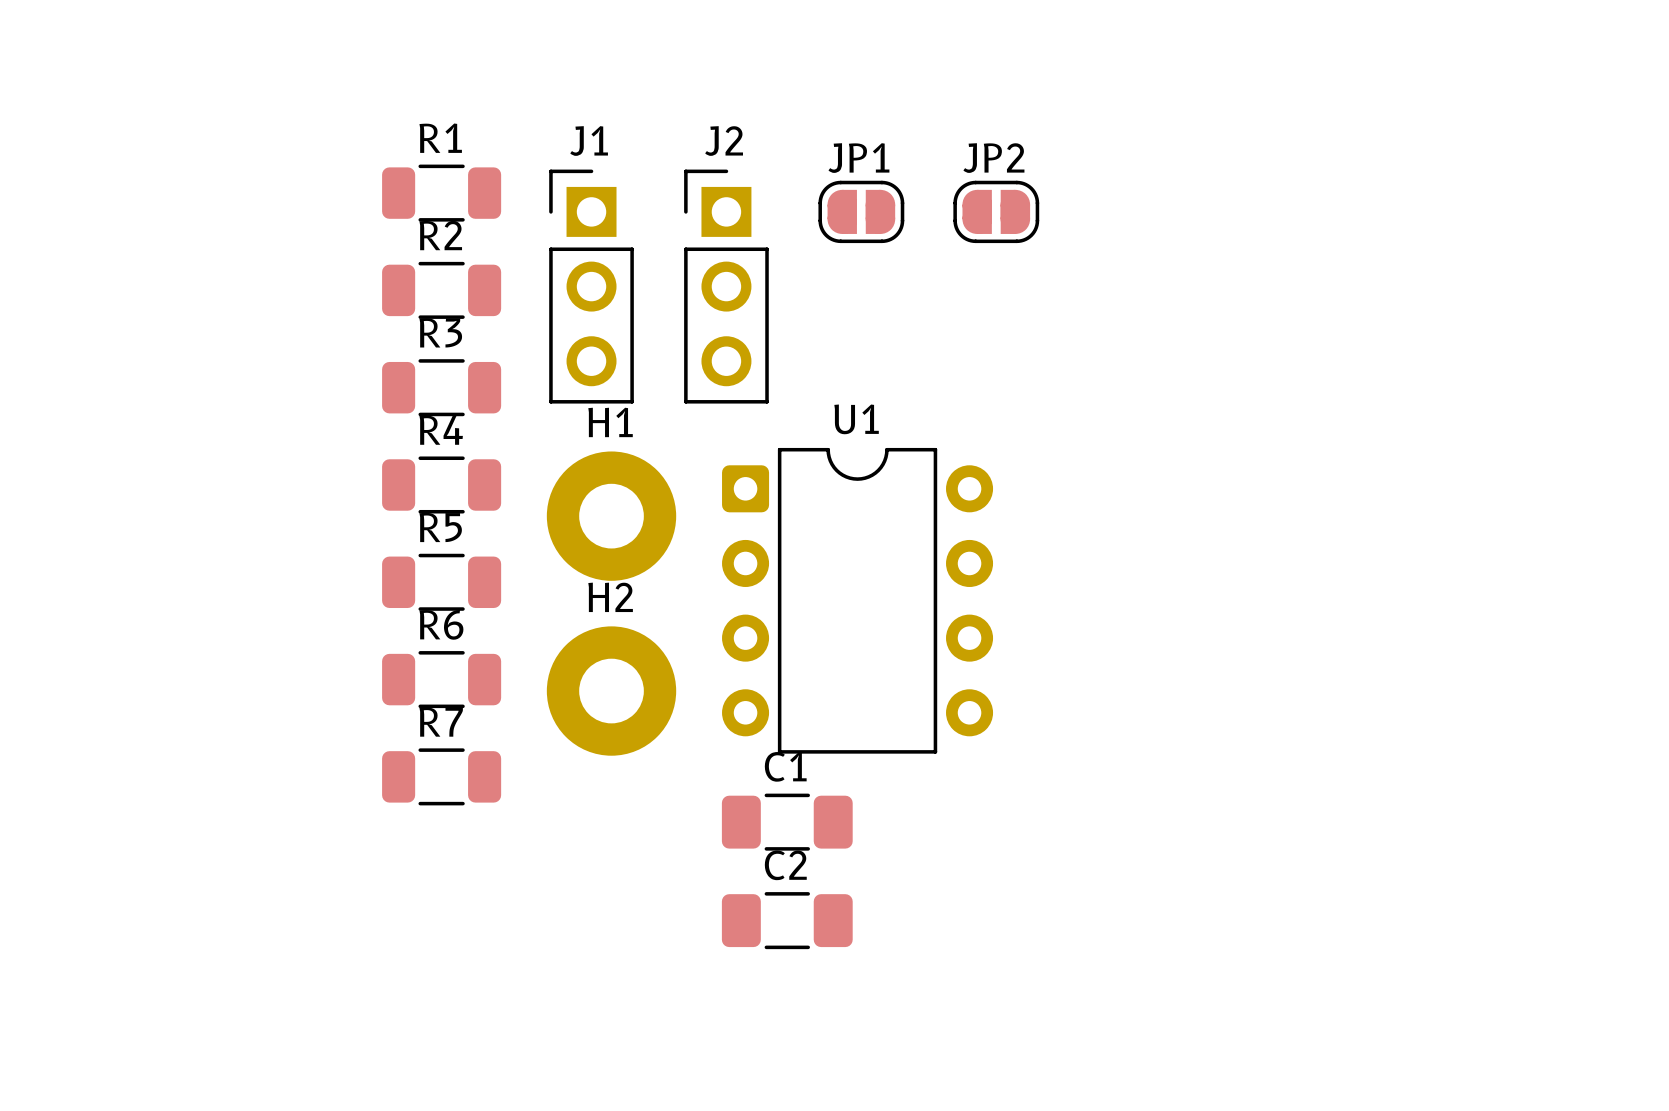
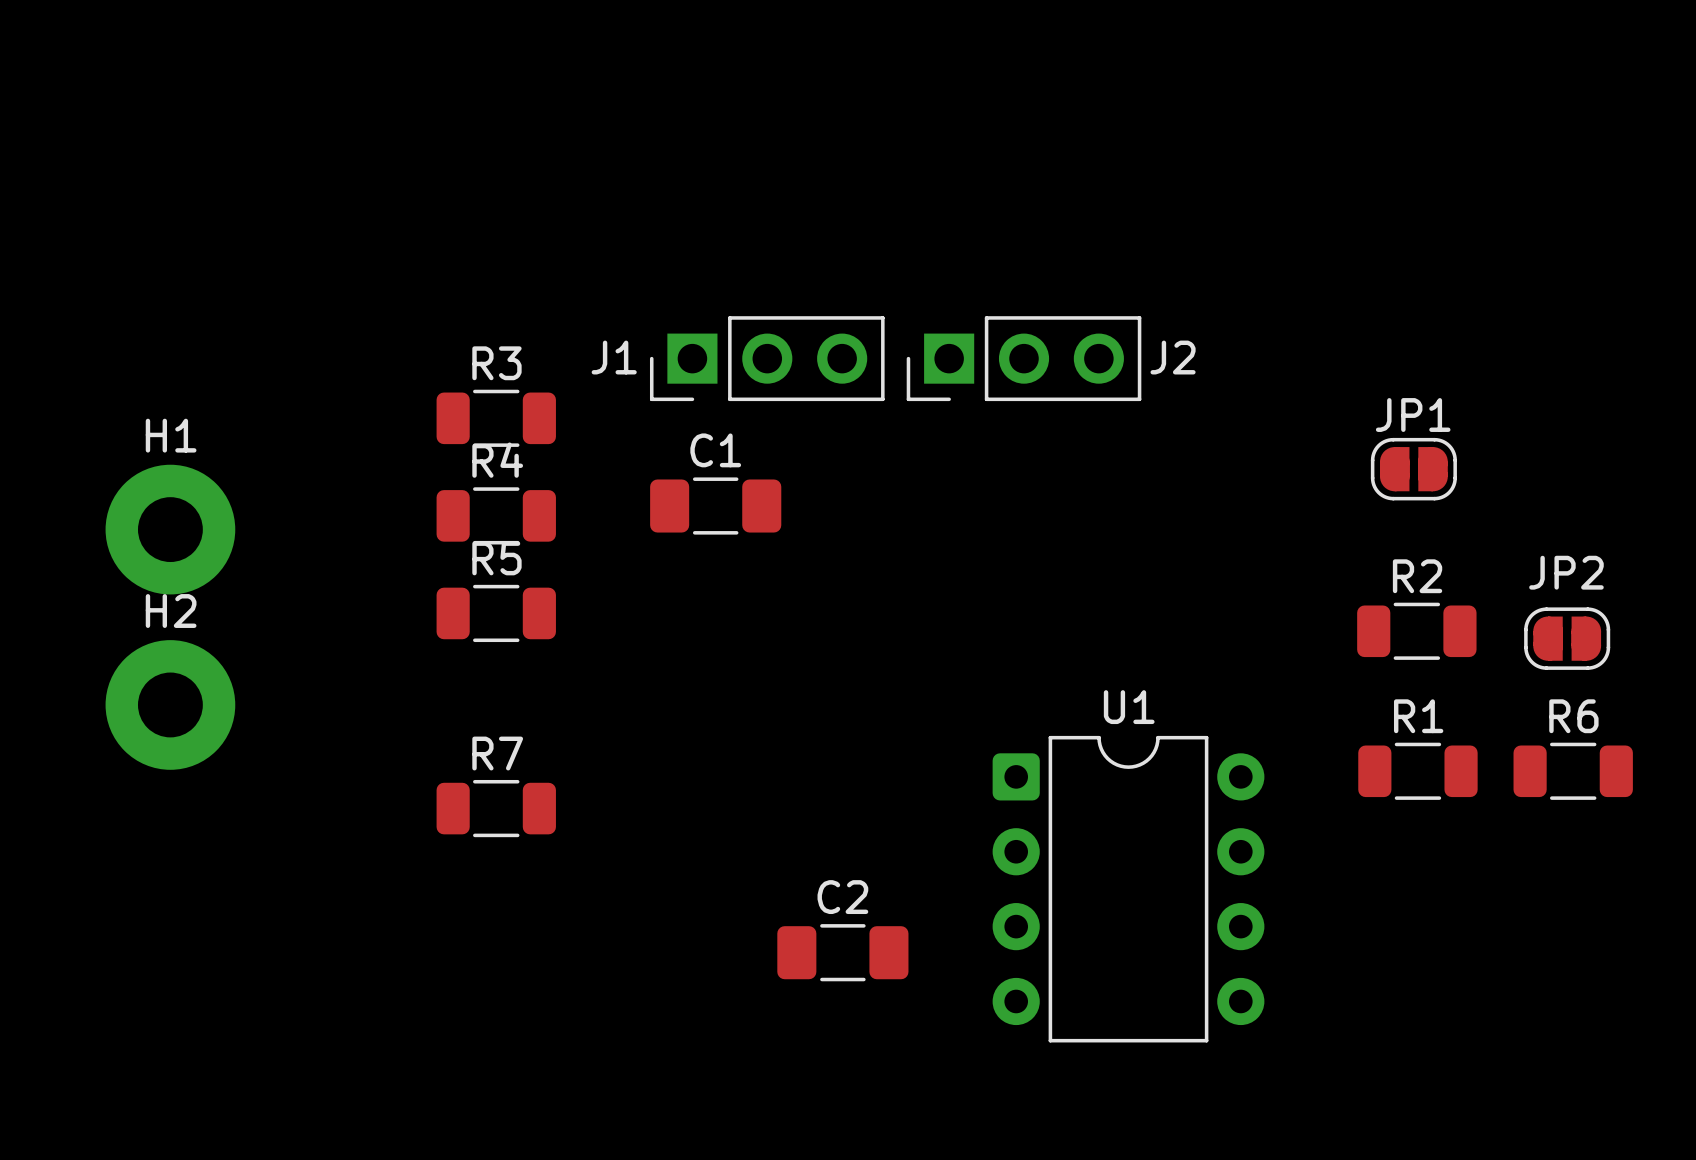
J2 name position: J2 (724, 141) -> J2 (1173, 357)
JP2 name position: JP2 (993, 158) -> JP2 (1566, 572)
R1 position: (441, 193) -> (1417, 771)
JP1 position: (861, 211) -> (1413, 469)
JP2 position: (996, 211) -> (1567, 638)
J1 rotation: 0° (591, 286) -> 90° counterclockwise (767, 358)
J2 rotation: 0° (726, 286) -> 90° counterclockwise (1024, 358)
J2 position: (726, 286) -> (1024, 358)
R2 position: (441, 290) -> (1416, 631)
H1 position: (611, 516) -> (170, 529)
U1 position: (857, 600) -> (1128, 889)
R6 position: (441, 679) -> (1573, 771)
H2 position: (611, 691) -> (170, 704)
C1 position: (787, 822) -> (715, 506)

